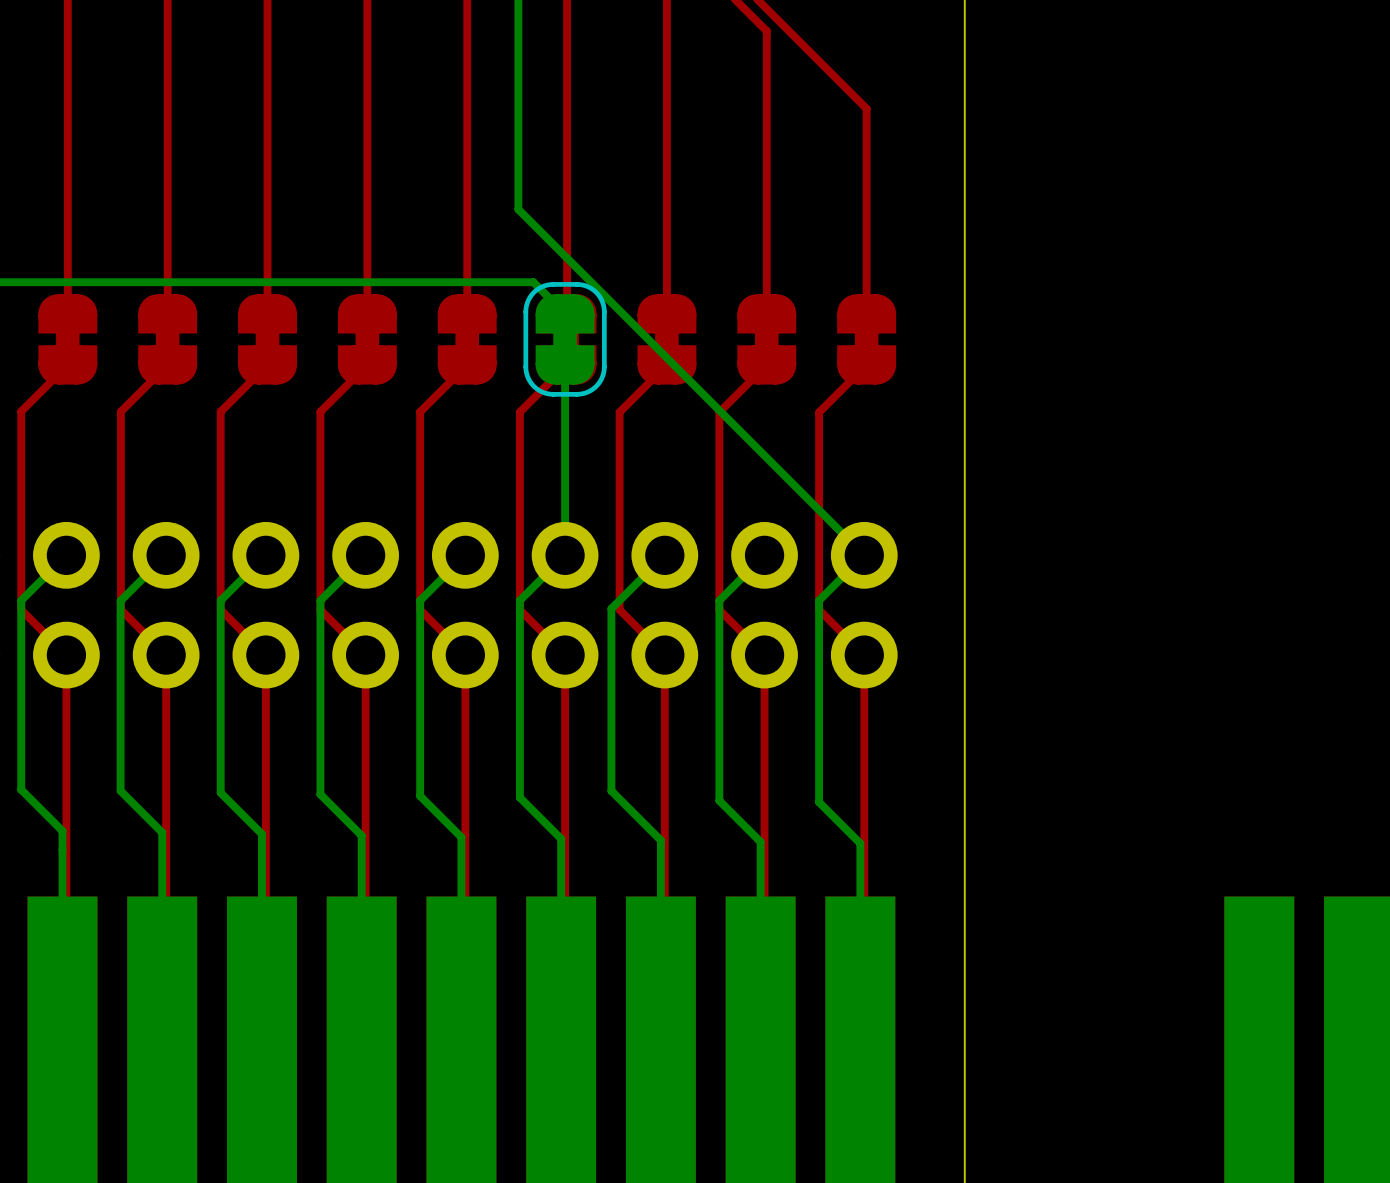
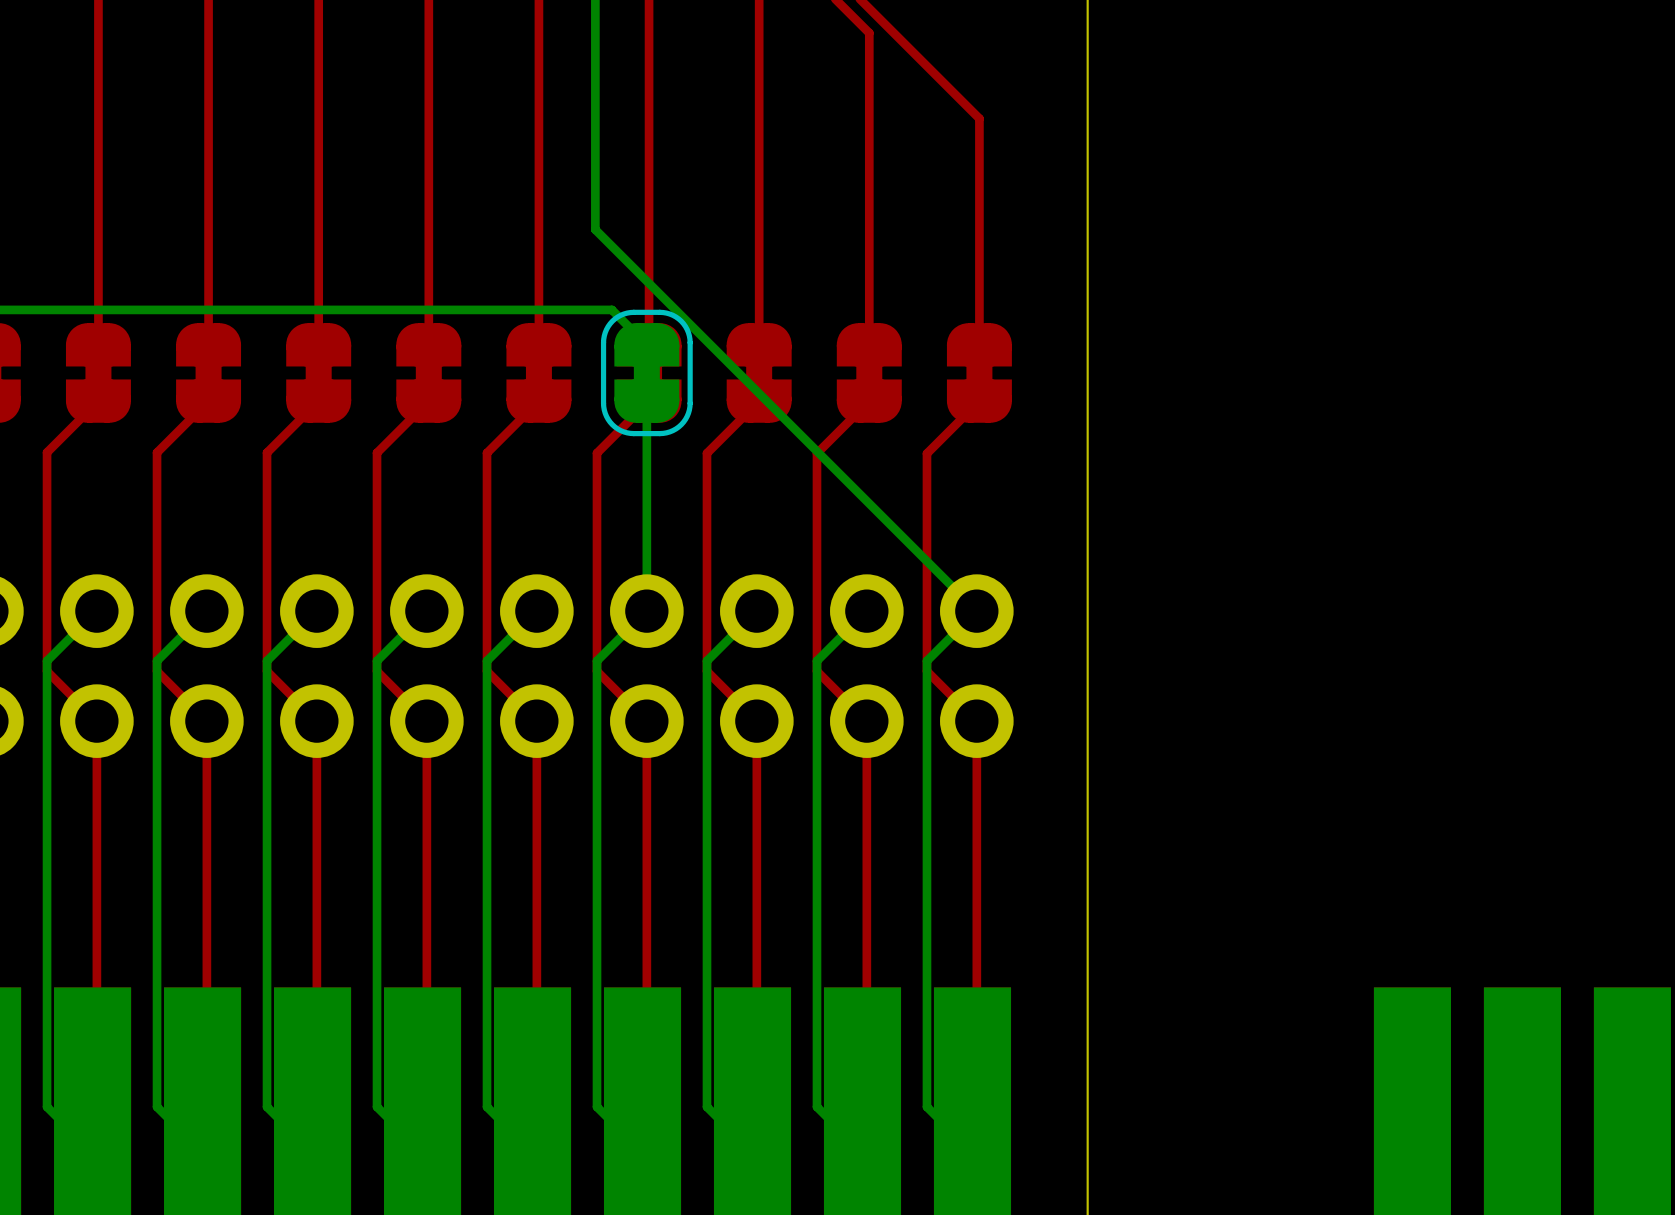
bottom track: (120, 600) (120, 790) (162, 832) (162, 1046) -> (157, 660) (157, 1106) (202, 1152)
bottom track: (619, 600) (611, 608) (611, 790) (660, 840) (660, 1046) -> (706, 660) (706, 1106) (752, 1152)
bottom track: (21, 789) (62, 830) (62, 1046) -> (47, 869) (47, 1106) (92, 1152)
bottom track: (220, 792) (261, 834) (261, 1046) -> (267, 873) (267, 1106) (312, 1152)
bottom track: (320, 794) (361, 835) (361, 1046) -> (377, 874) (377, 1106) (422, 1152)
bottom track: (420, 796) (461, 837) (461, 1046) -> (487, 876) (487, 1106) (532, 1152)
bottom track: (519, 797) (561, 838) (561, 1046) -> (597, 878) (597, 1106) (642, 1152)
bottom track: (719, 800) (760, 841) (760, 1046) -> (816, 881) (816, 1106) (862, 1152)
bottom track: (819, 802) (860, 843) (860, 1046) -> (926, 883) (926, 1106) (972, 1152)

